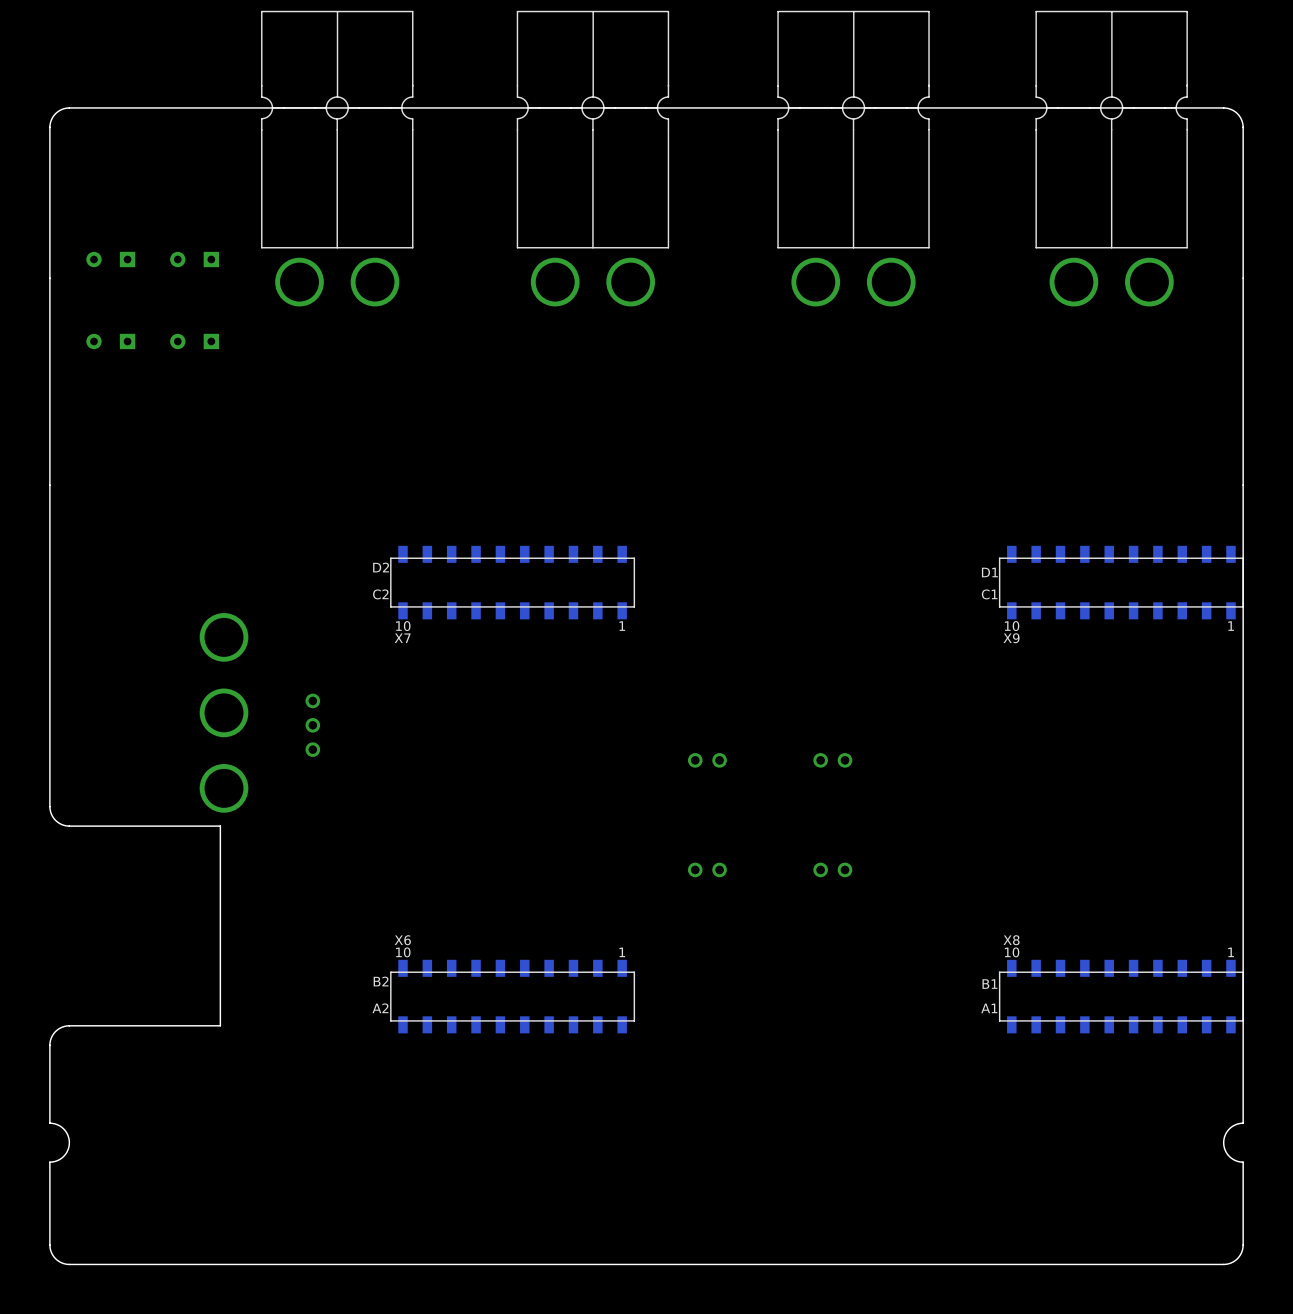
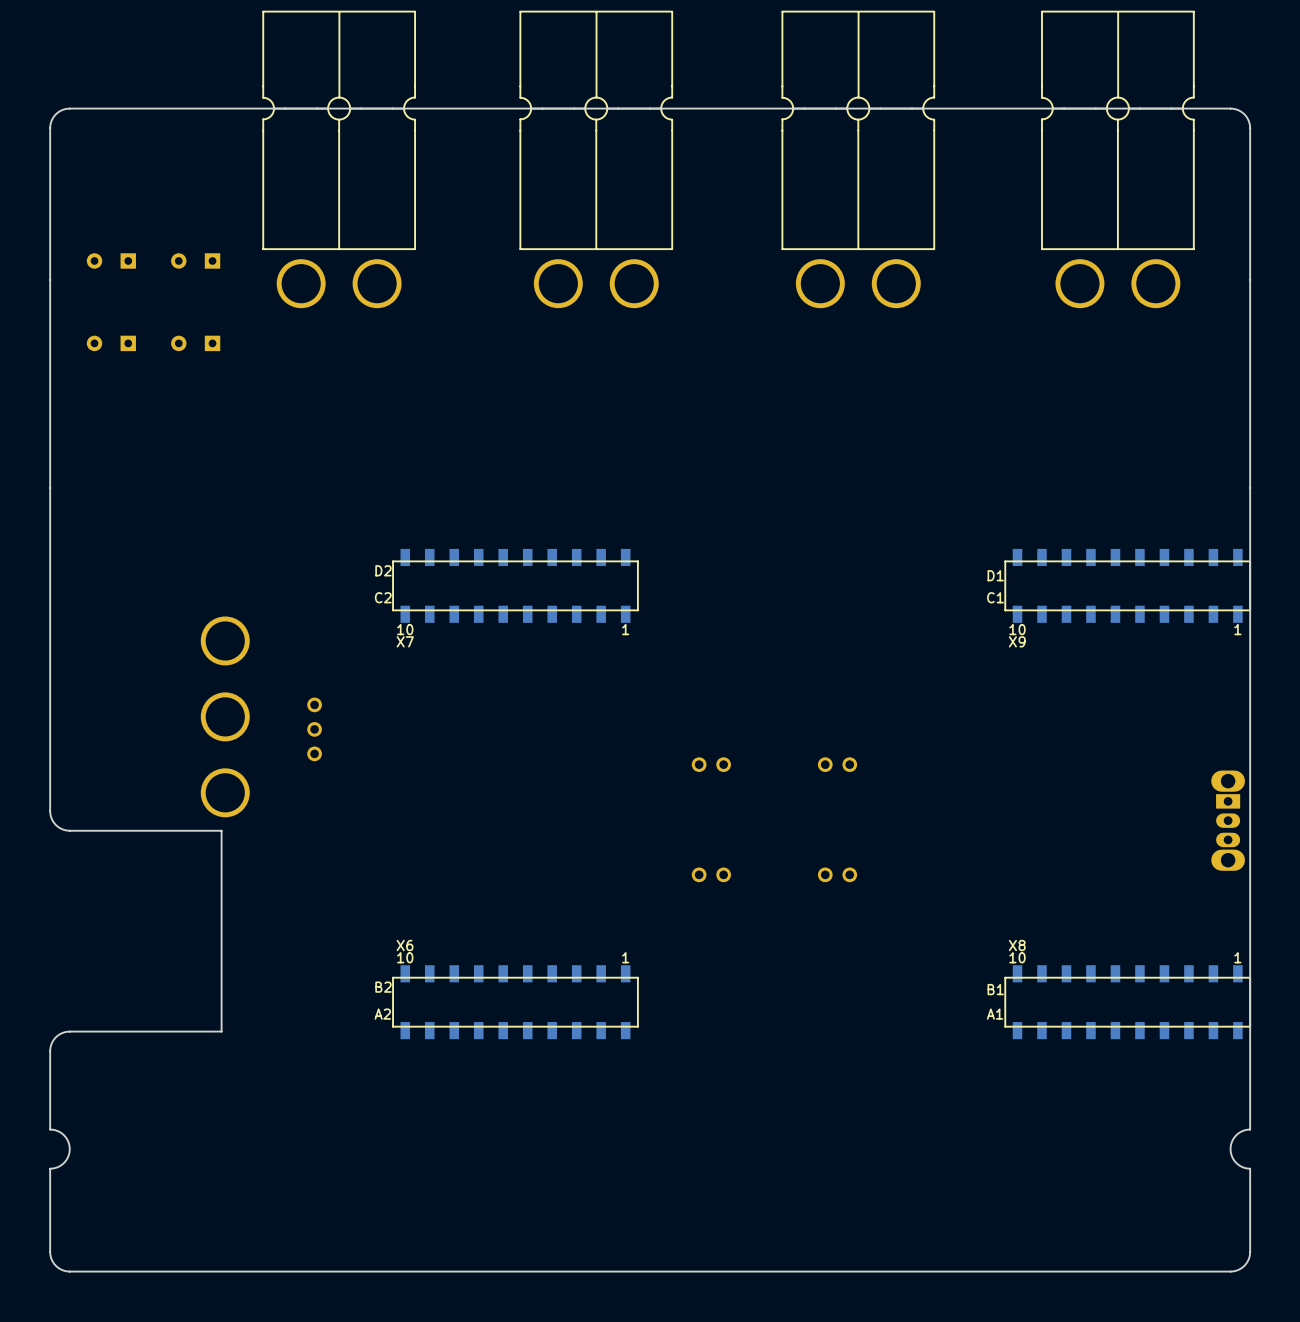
part: none -> (1228, 820)

